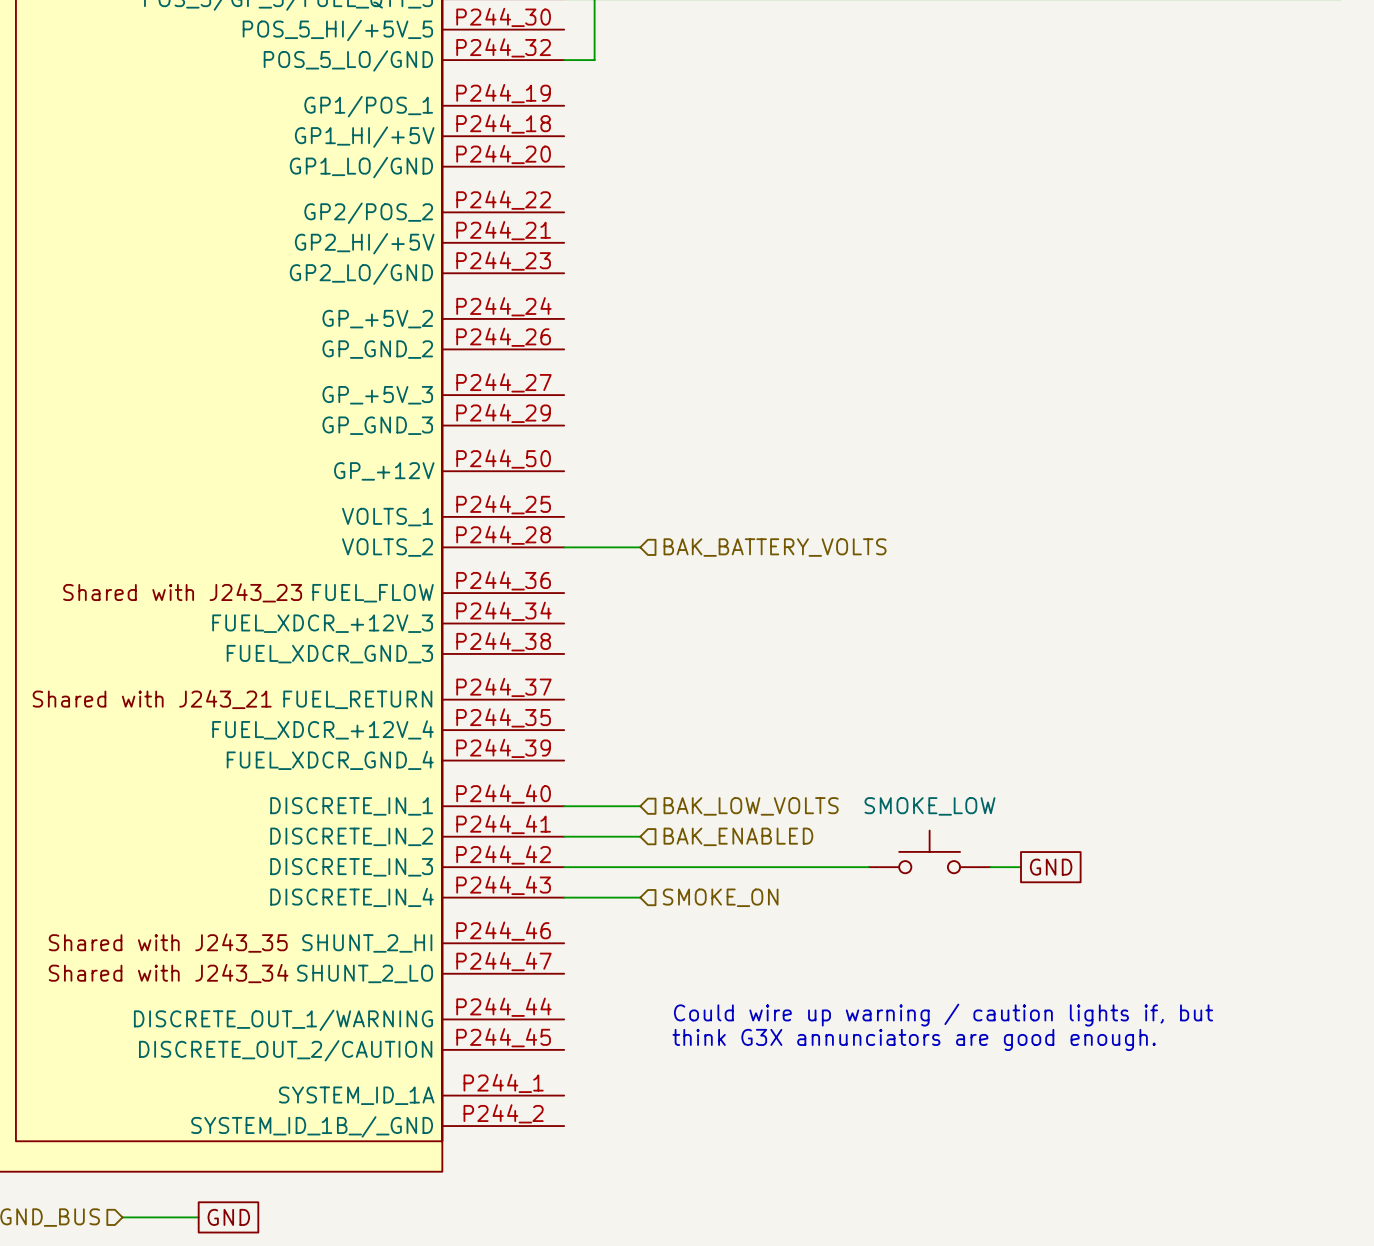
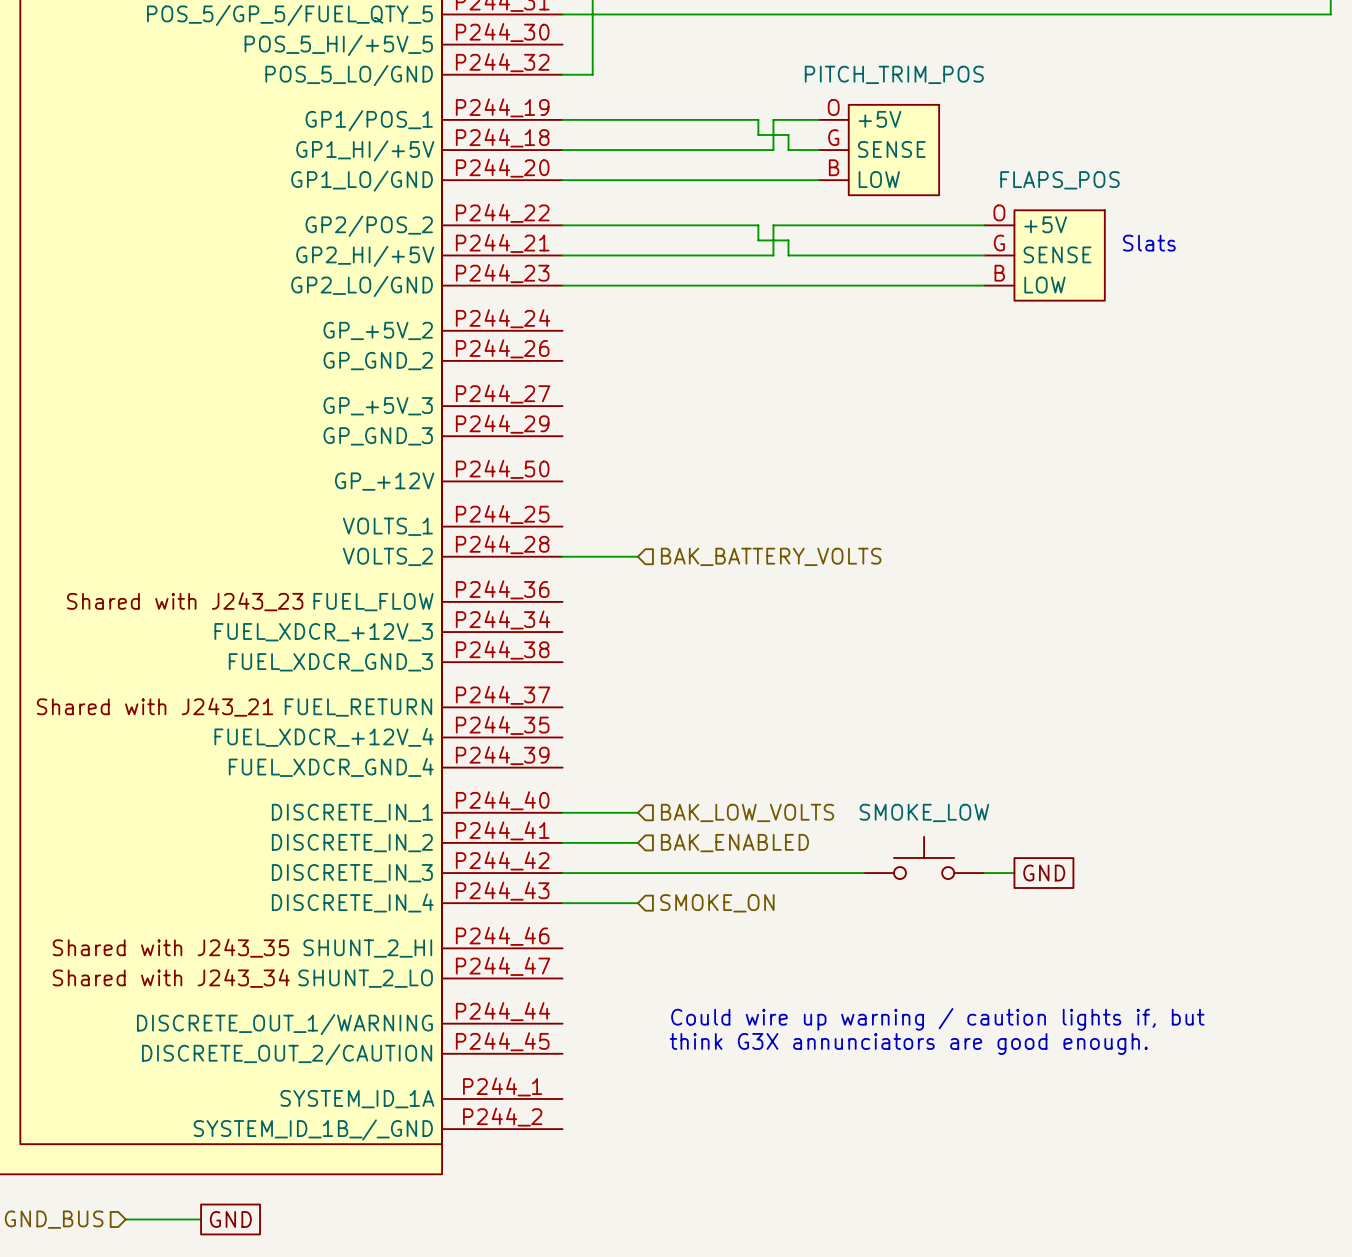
wire: none -> (562, 119) (758, 119) (758, 134) (788, 134) (788, 150) (818, 150)
wire: none -> (818, 119) (773, 119) (773, 150) (562, 150)
PITCH_TRIM_POS: none -> (878, 150)
wire: none -> (562, 180) (818, 180)
wire: none -> (562, 225) (758, 225) (758, 240) (788, 240) (788, 255) (984, 255)
wire: none -> (984, 225) (773, 225) (773, 255) (562, 255)
text: none -> Slats (1149, 243)
FLAPS_POS: none -> (1044, 255)
wire: none -> (562, 285) (984, 285)

